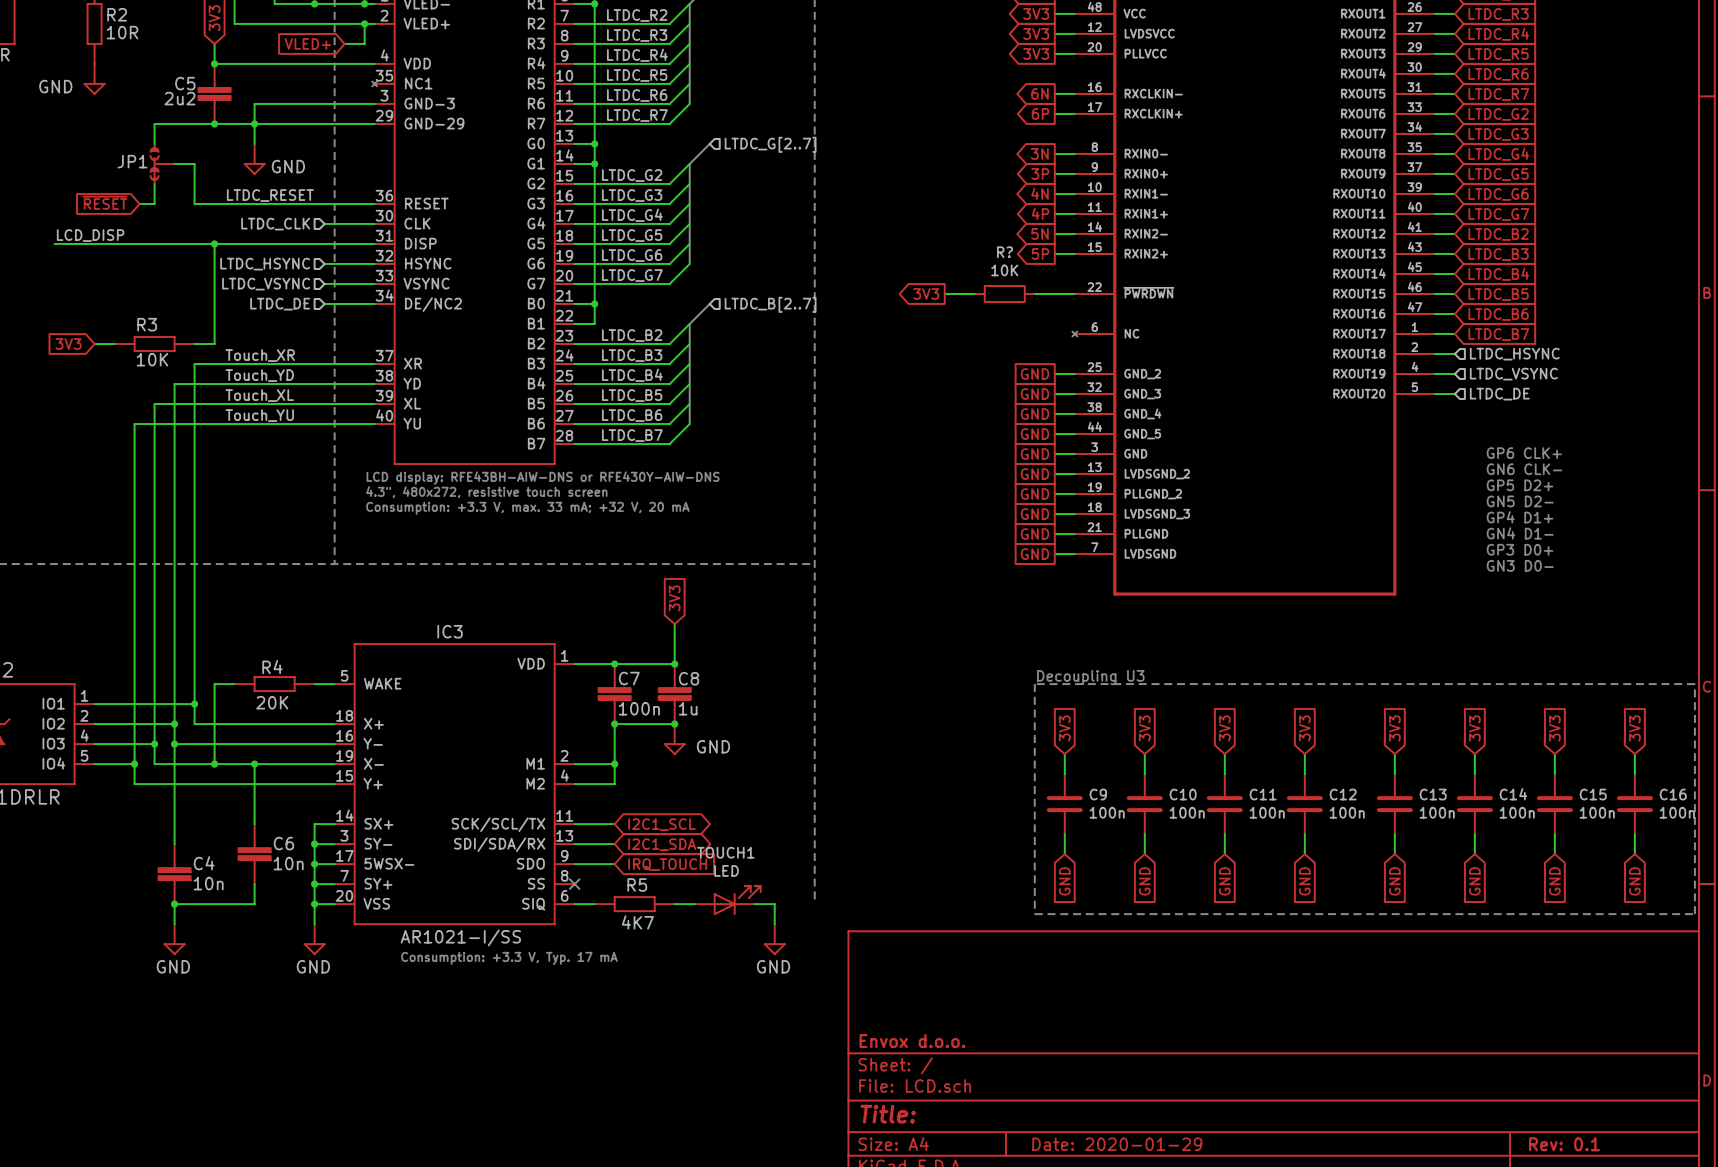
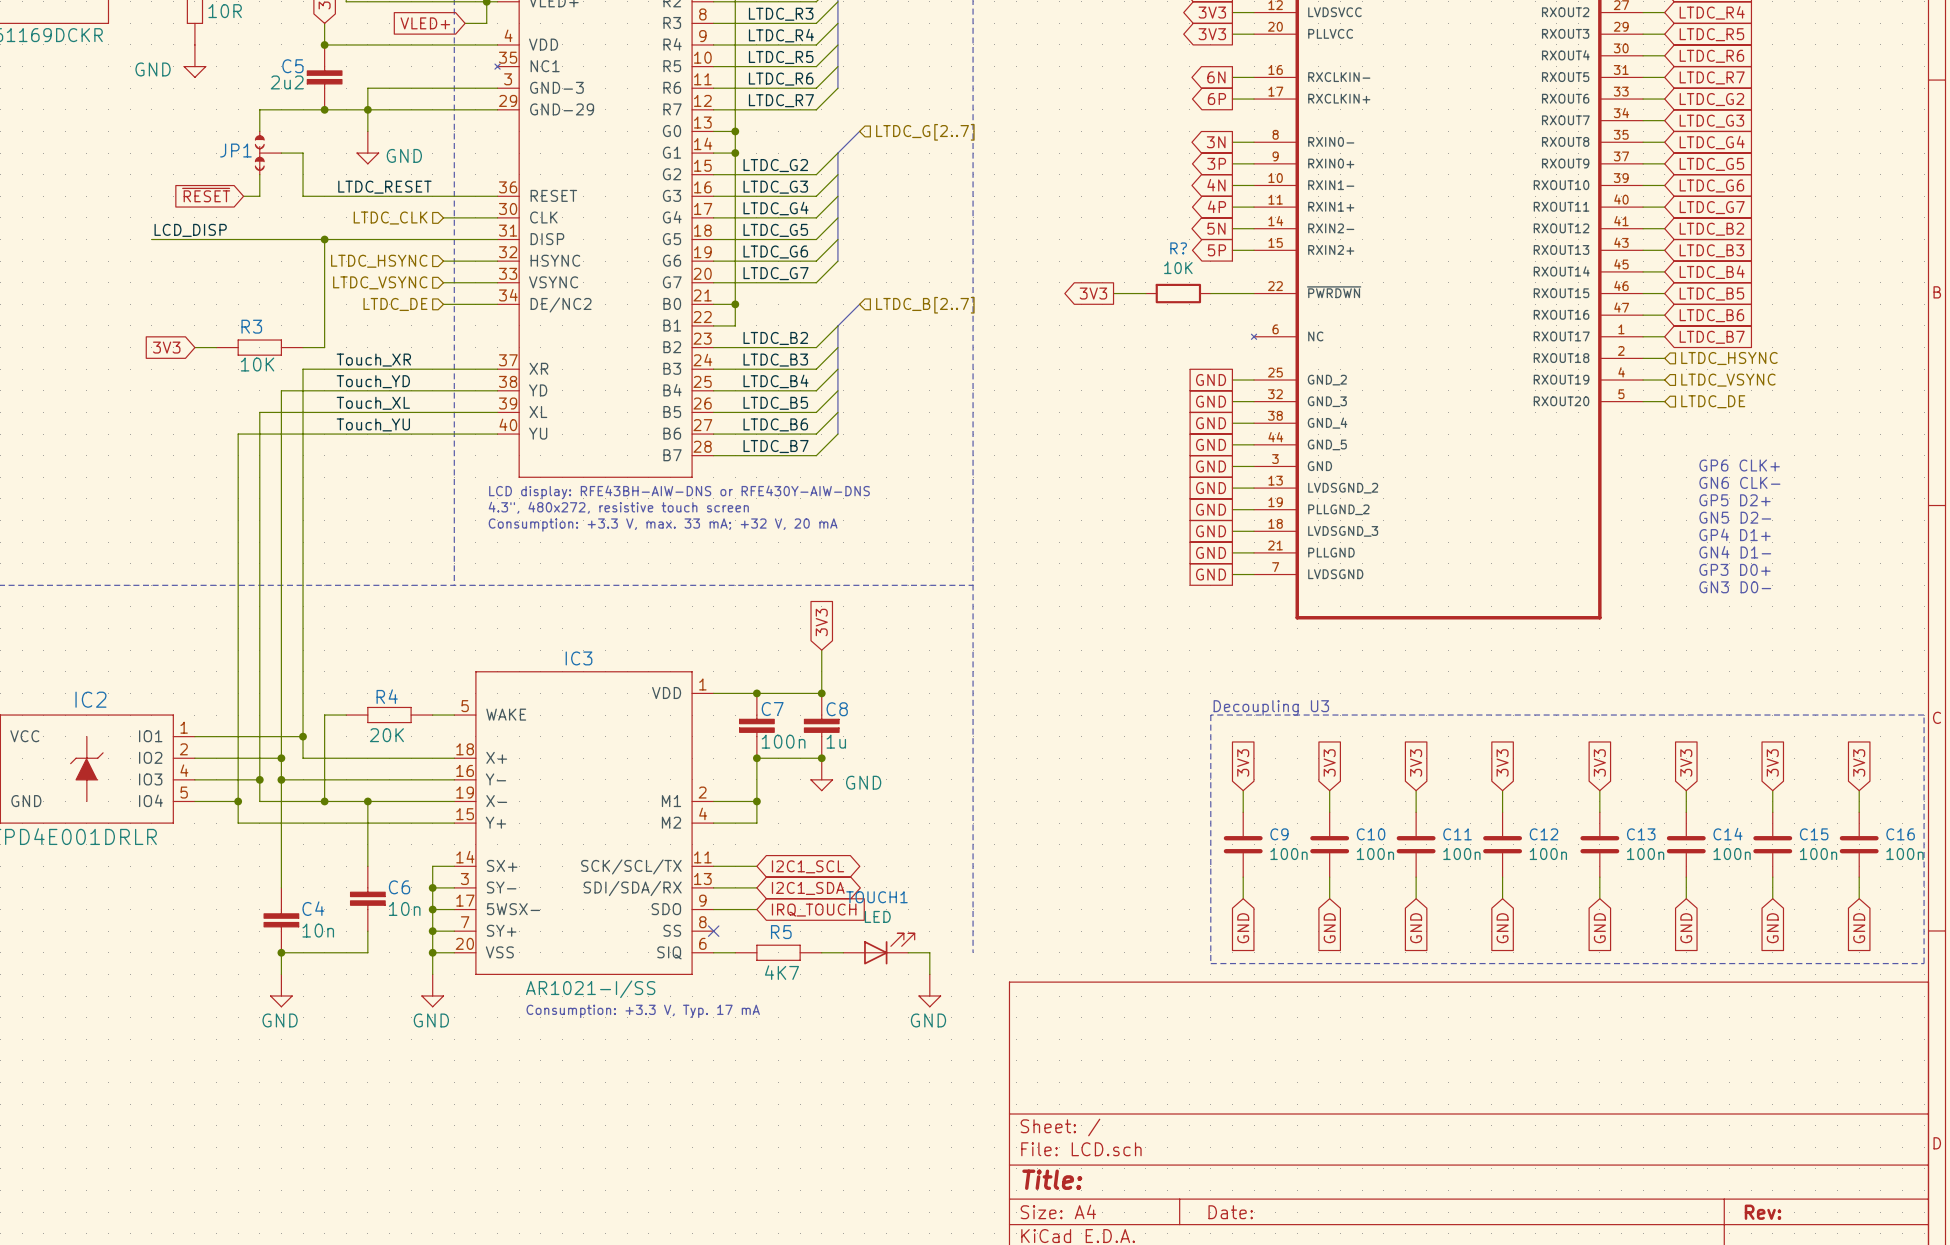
title block: Envox d.o.o. (912, 1041) -> none
title block: Date: 2020-01-29 (1117, 1144) -> Date: (1230, 1212)
title block: Rev: 0.1 (1564, 1144) -> Rev: (1763, 1212)

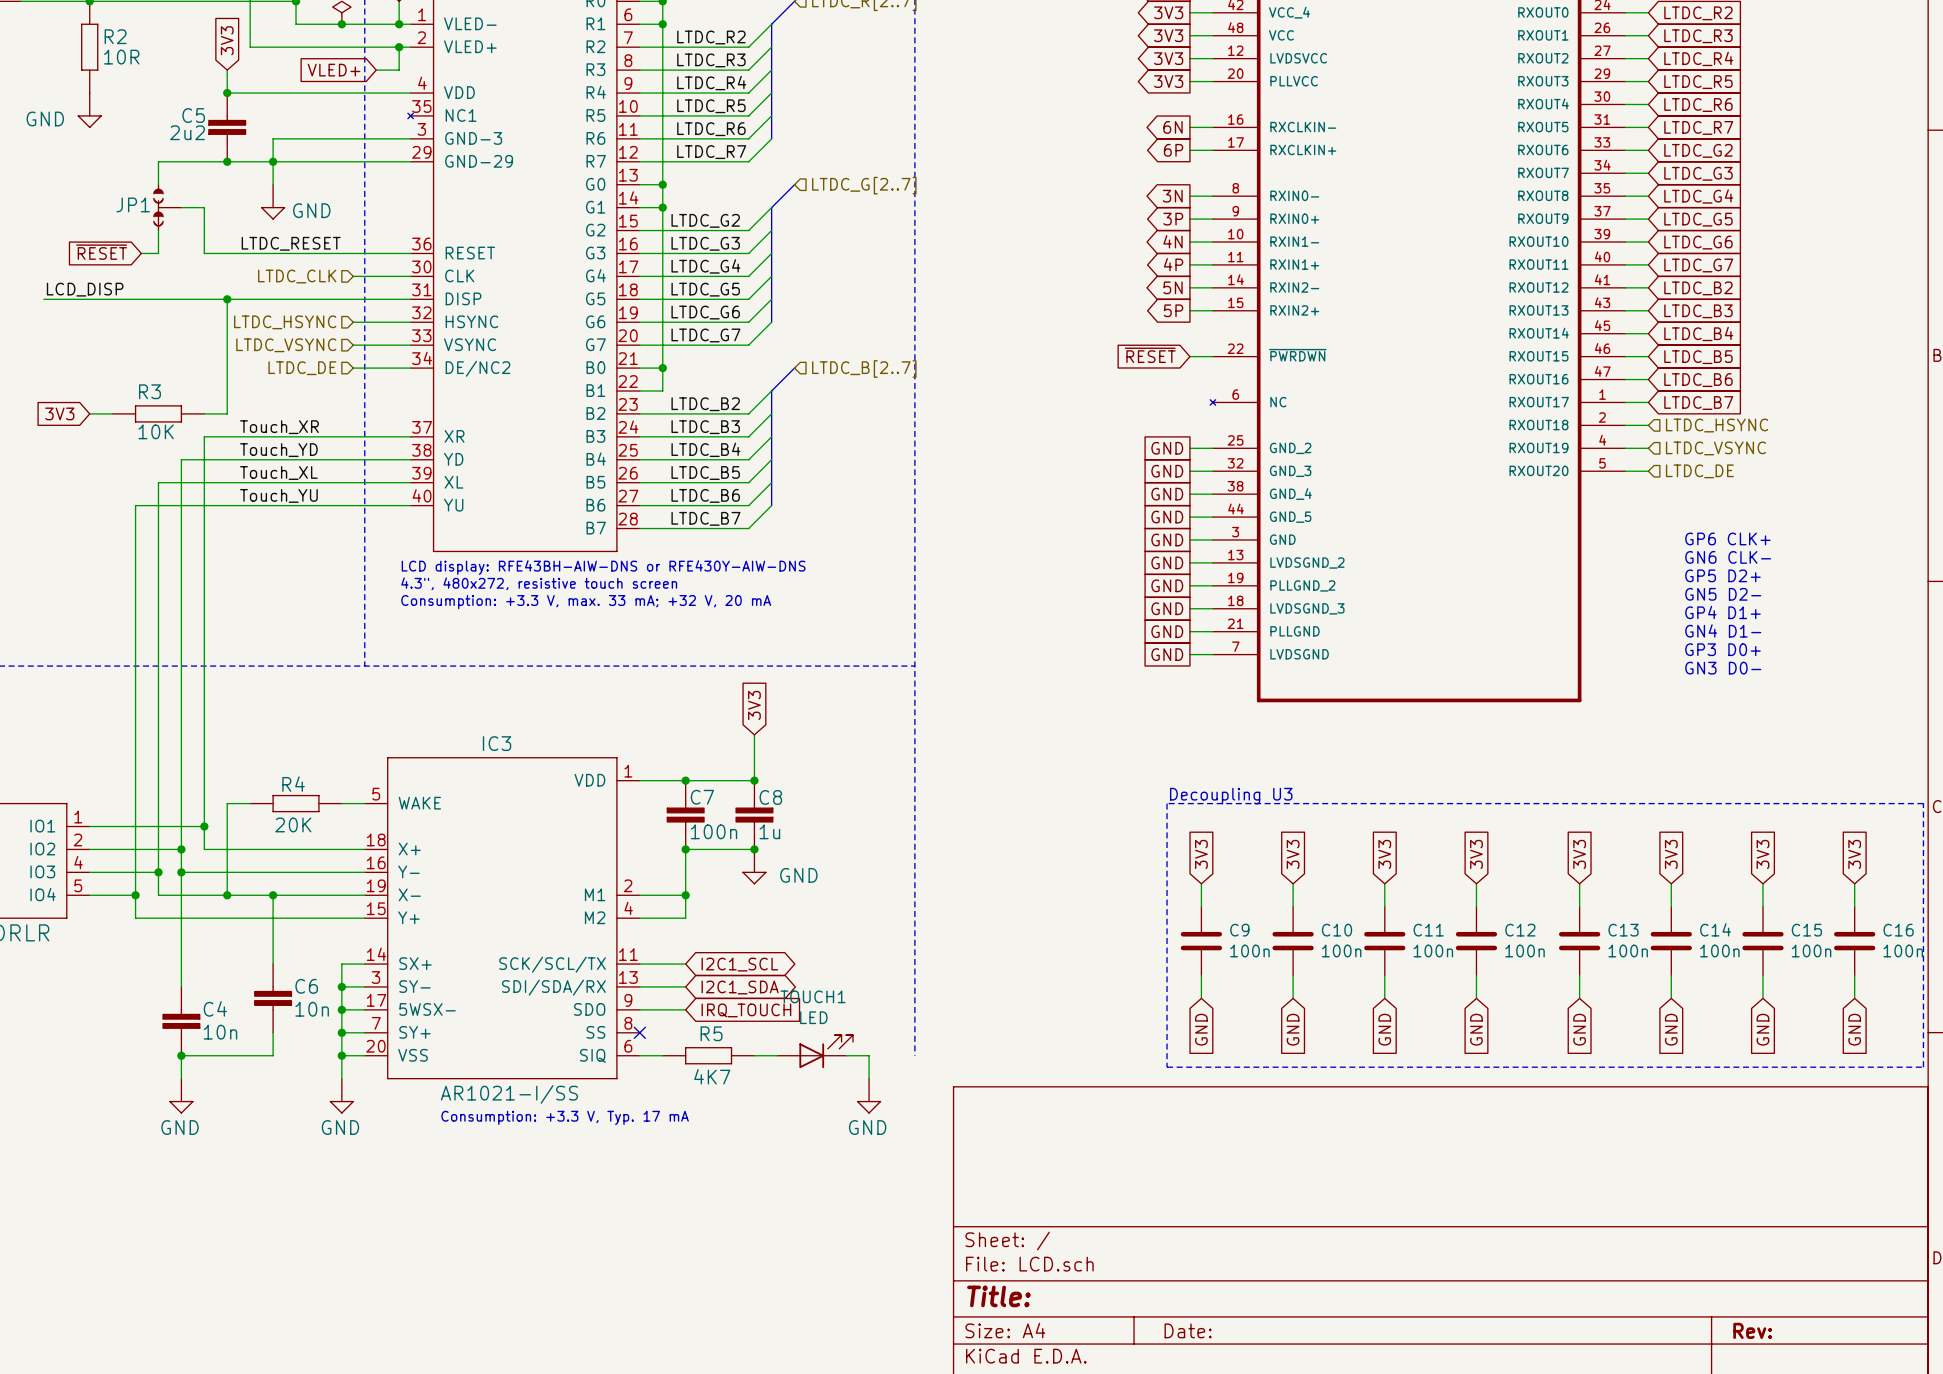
global label: none -> ~{RESET} (1150, 355)
global label: 3V3 (1093, 293) -> none
wire: (1113, 293) (1145, 293) -> none
R?: 10K (1178, 293) -> none
wire: (1210, 293) (1232, 293) -> none

